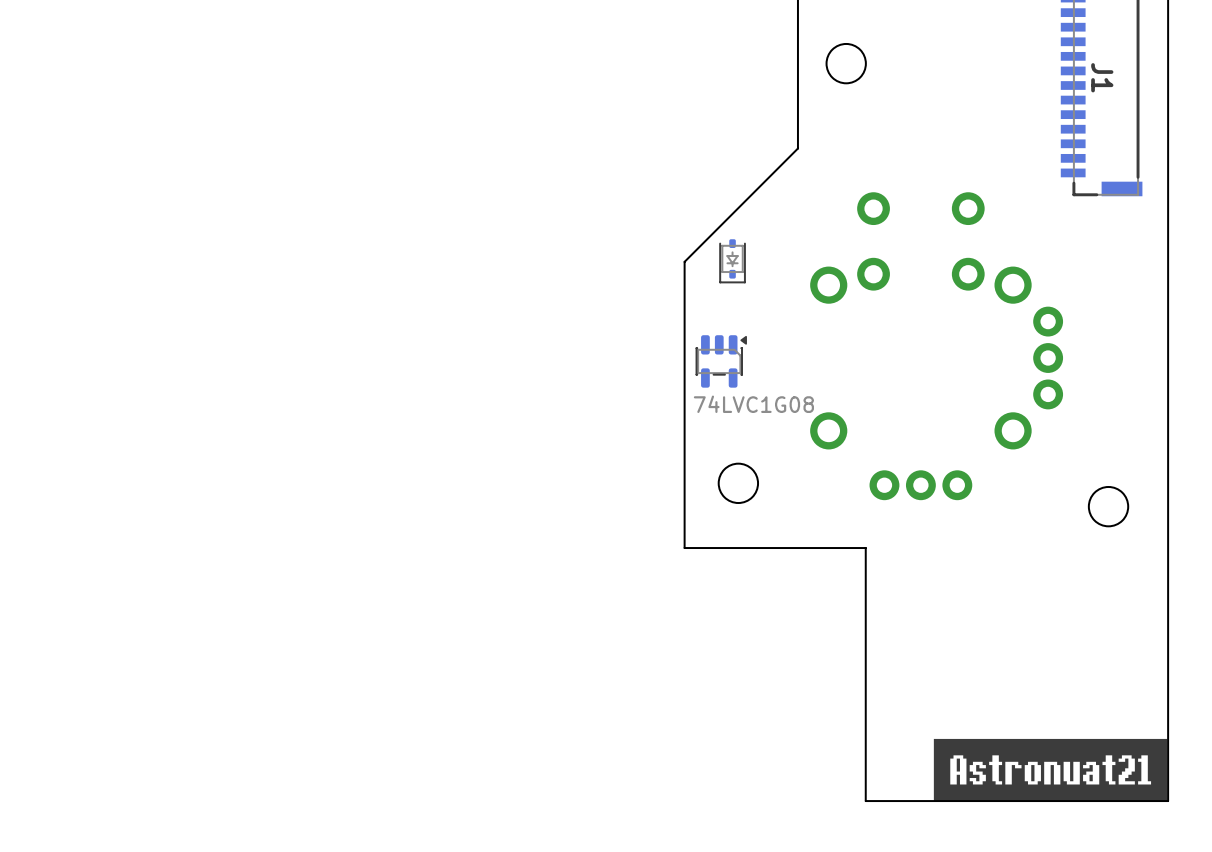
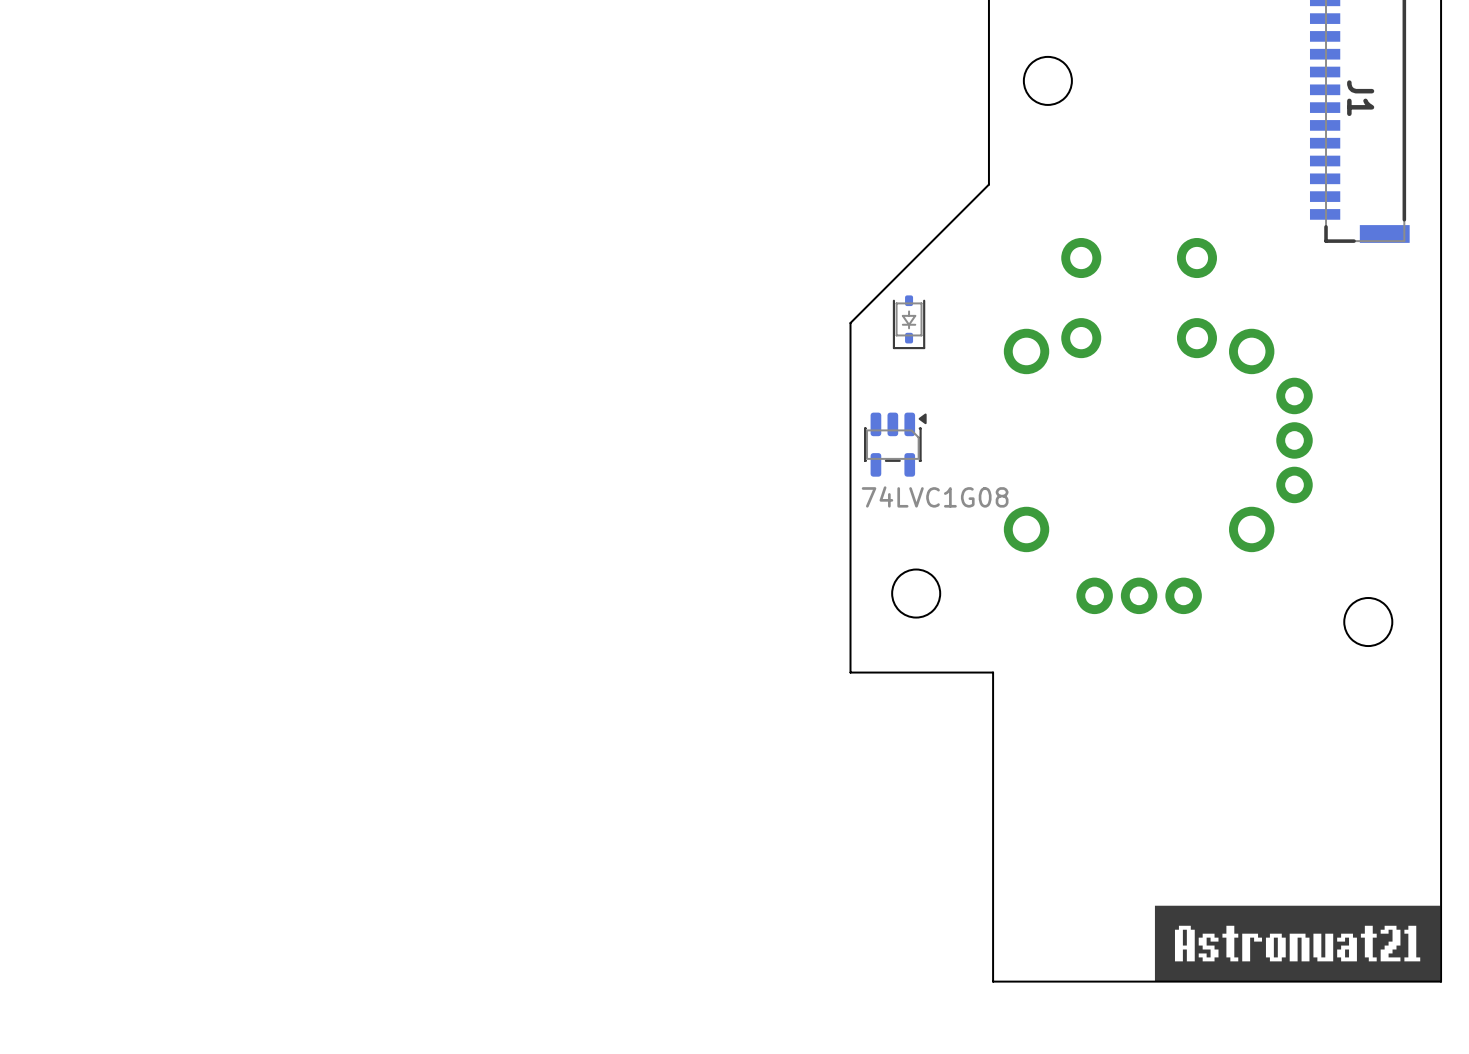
board edge: (801, 548) (865, 548) (865, 801) -> (993, 672) (993, 981) (1071, 981)

